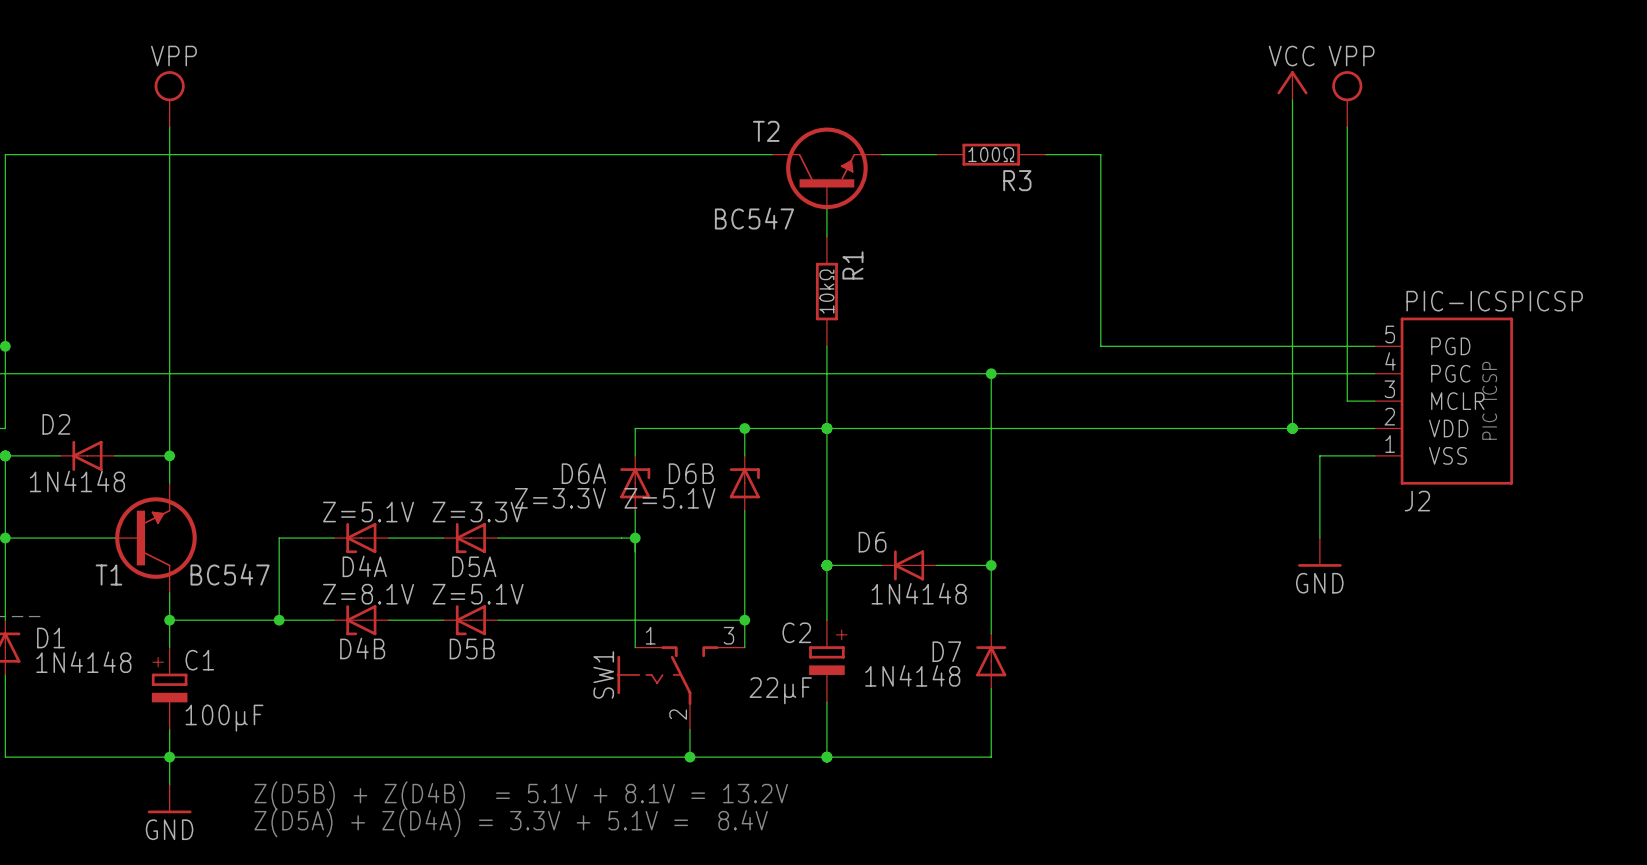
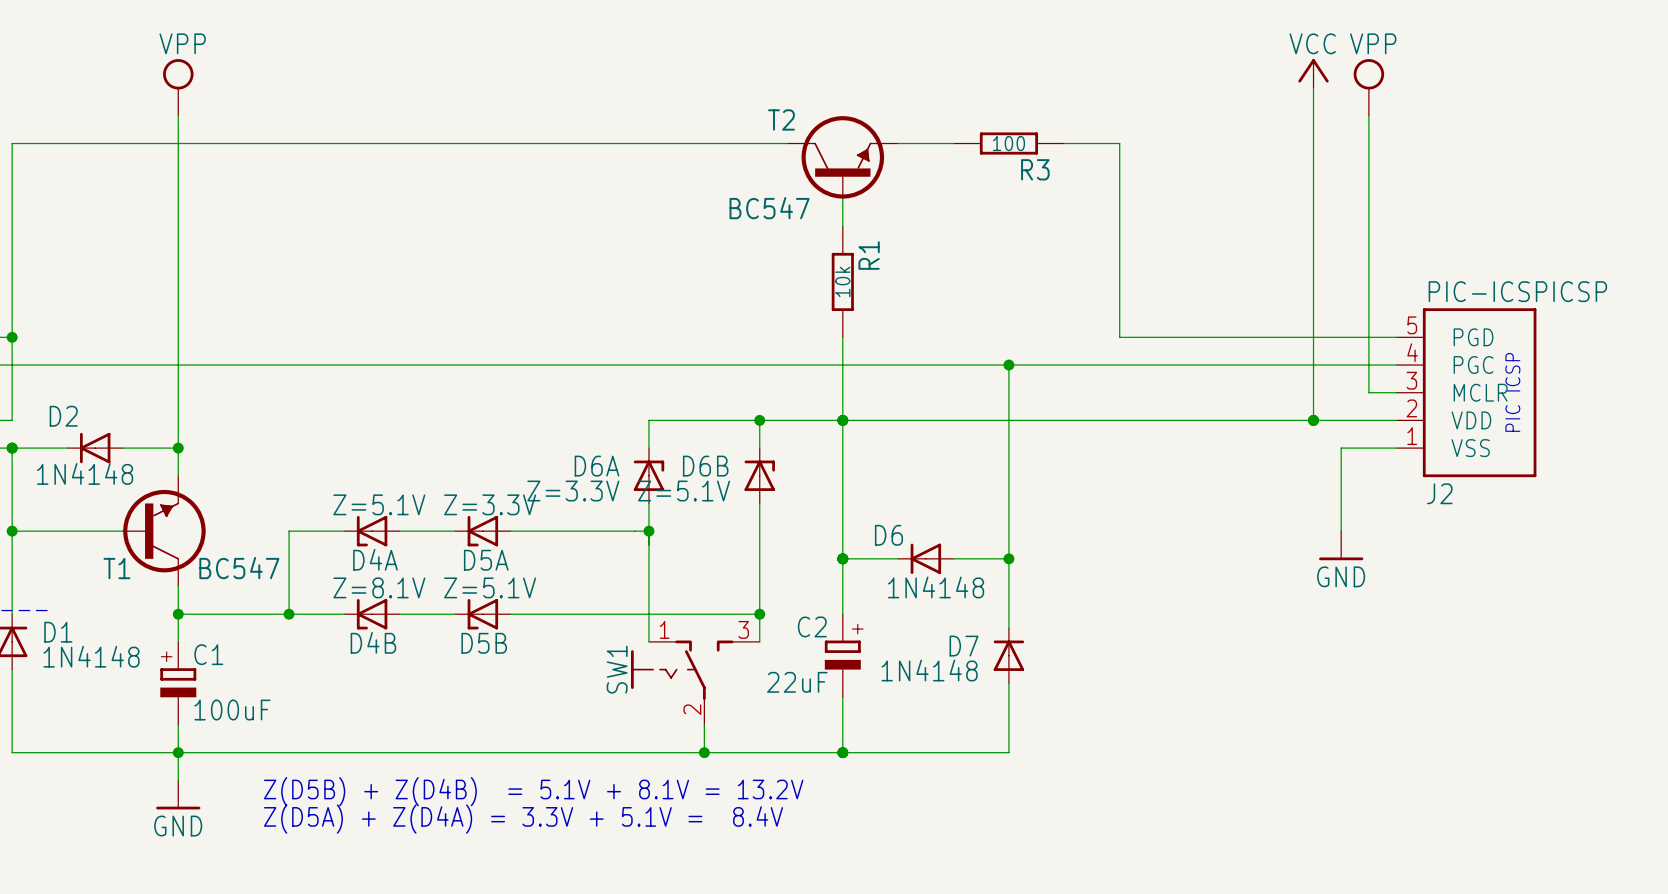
R3 value: 100Ω (991, 154) -> 100 (1008, 143)
R1 value: 10kΩ (826, 291) -> 10k (842, 281)
C2 value: 22μF (780, 690) -> 22uF (797, 682)
C1 value: 100μF (224, 718) -> 100uF (232, 710)

